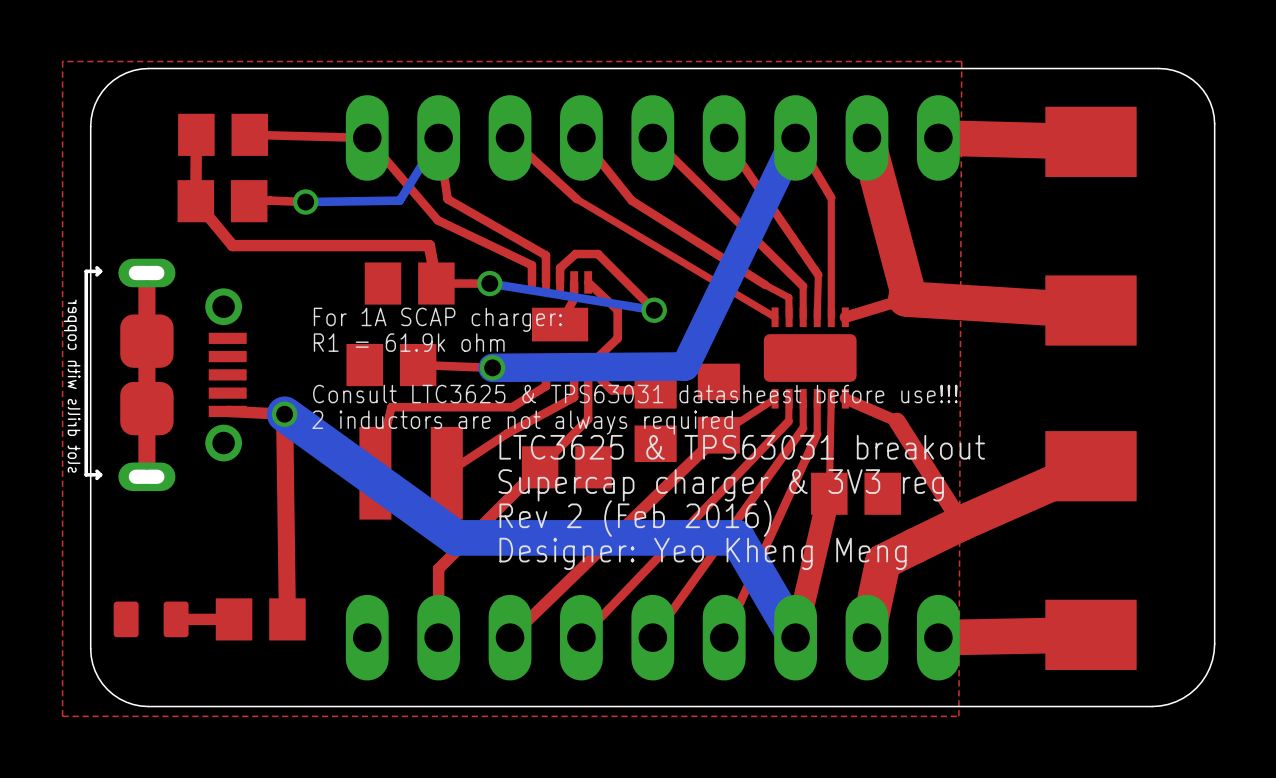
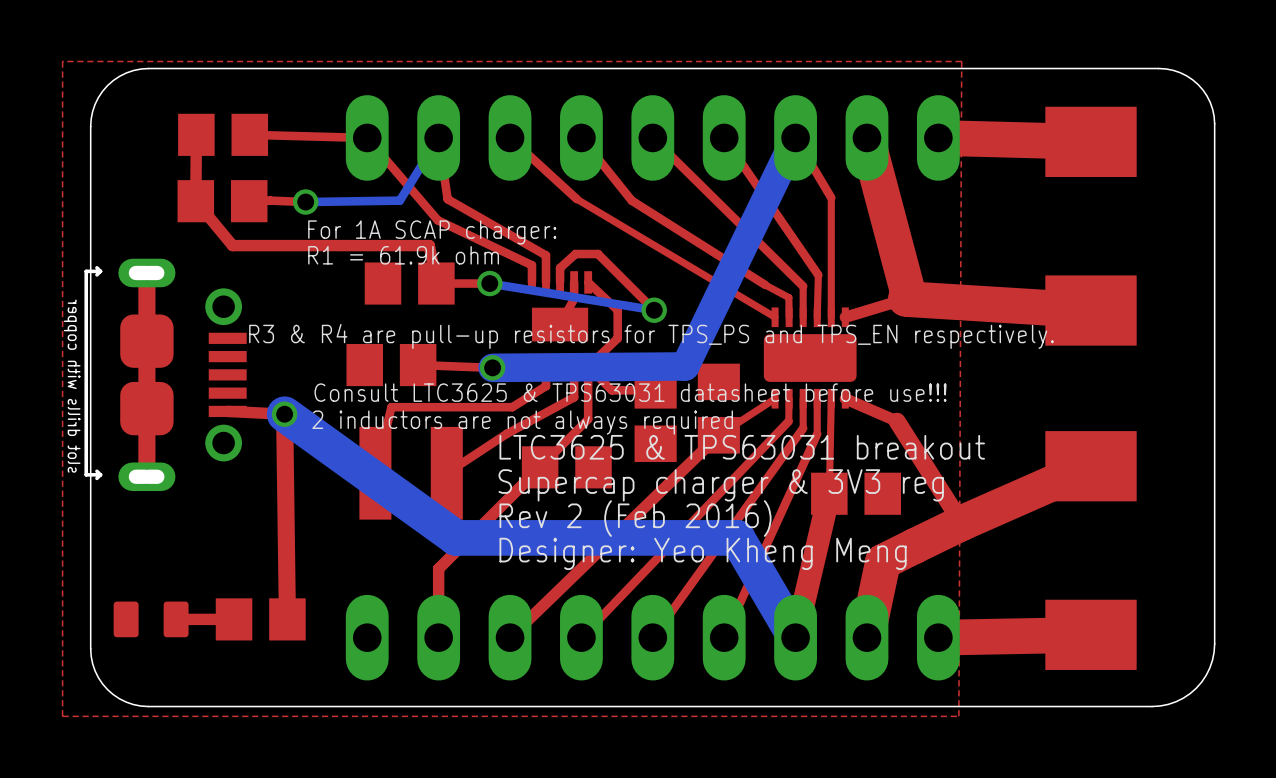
text position: For 1A SCAP charger: (437, 319) -> For 1A SCAP charger: (432, 232)
text: none -> R3 & R4 are pull-up resistors for TPS_PS and TPS_EN respectively. (651, 336)
text position: R1 = 61.9k ohm (409, 342) -> R1 = 61.9k ohm (403, 255)
text: Consult LTC3625 & TPS63031 datasheest before use!!! (635, 394) -> Consult LTC3625 & TPS63031 datasheet before use!!! (630, 392)

